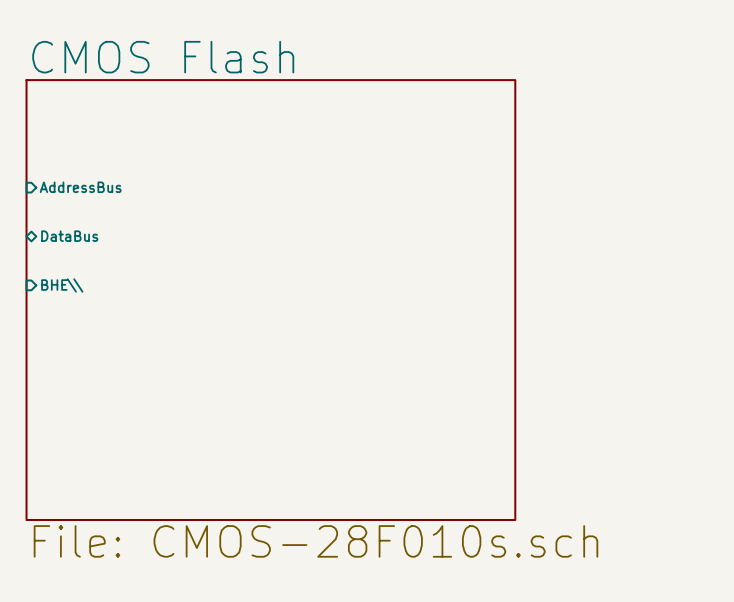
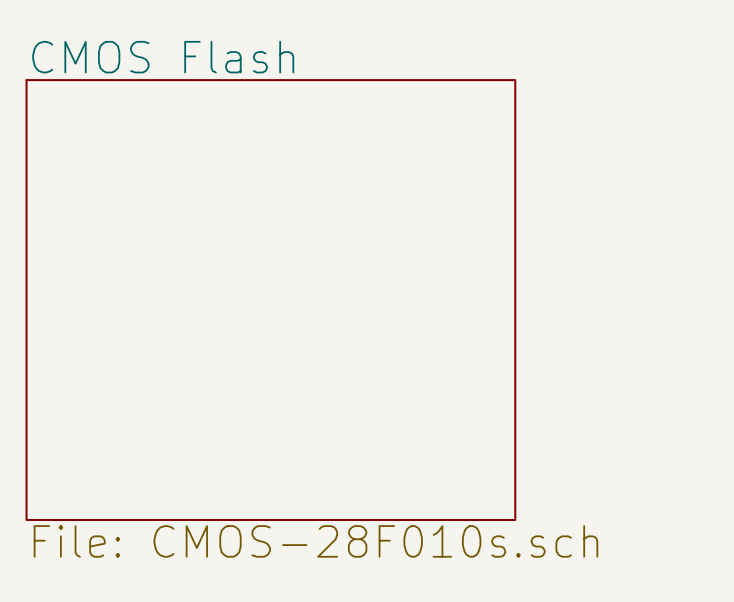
sheet pin: AddressBus (80, 187) -> none
sheet pin: DataBus (69, 236) -> none
sheet pin: BHE\\ (62, 285) -> none

